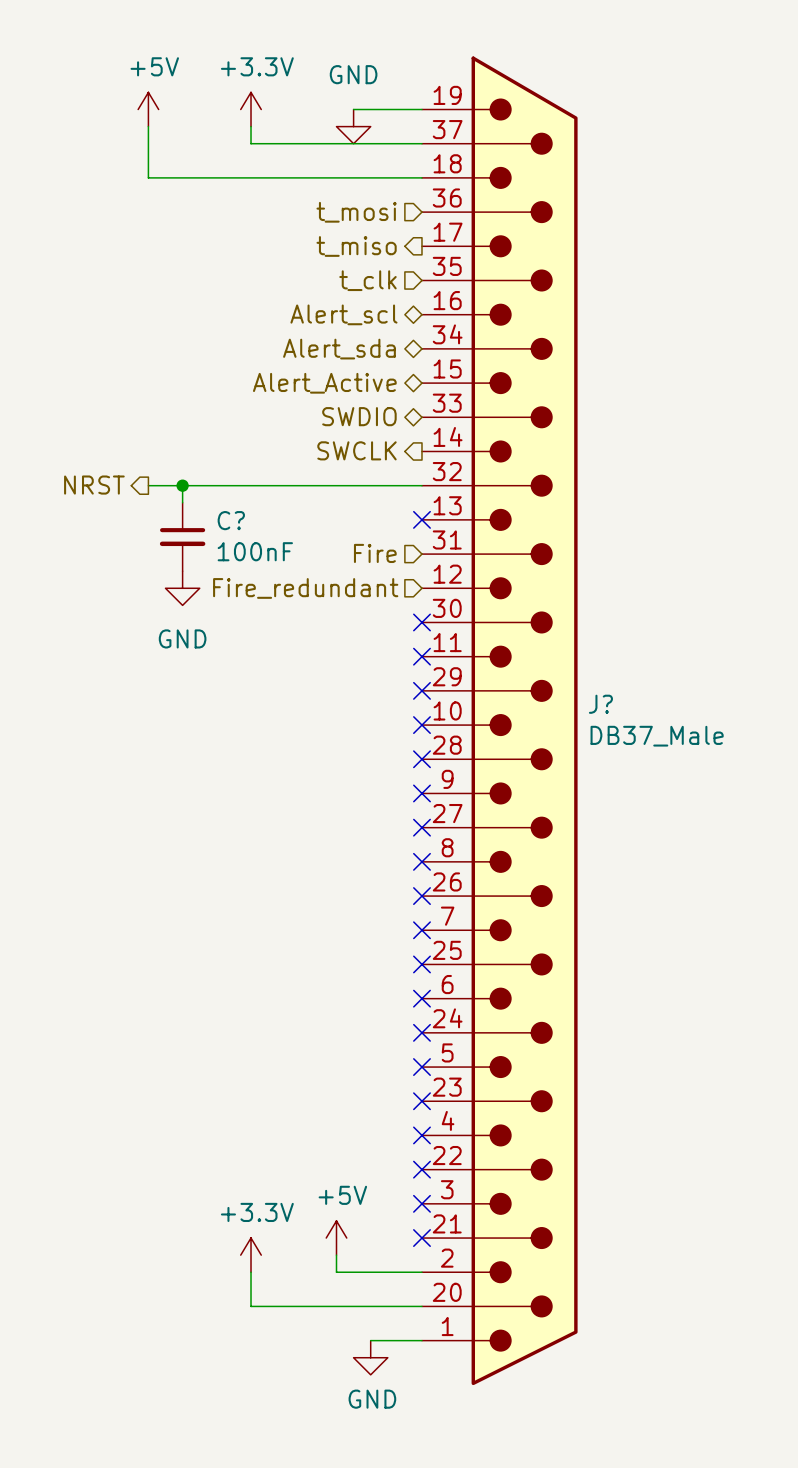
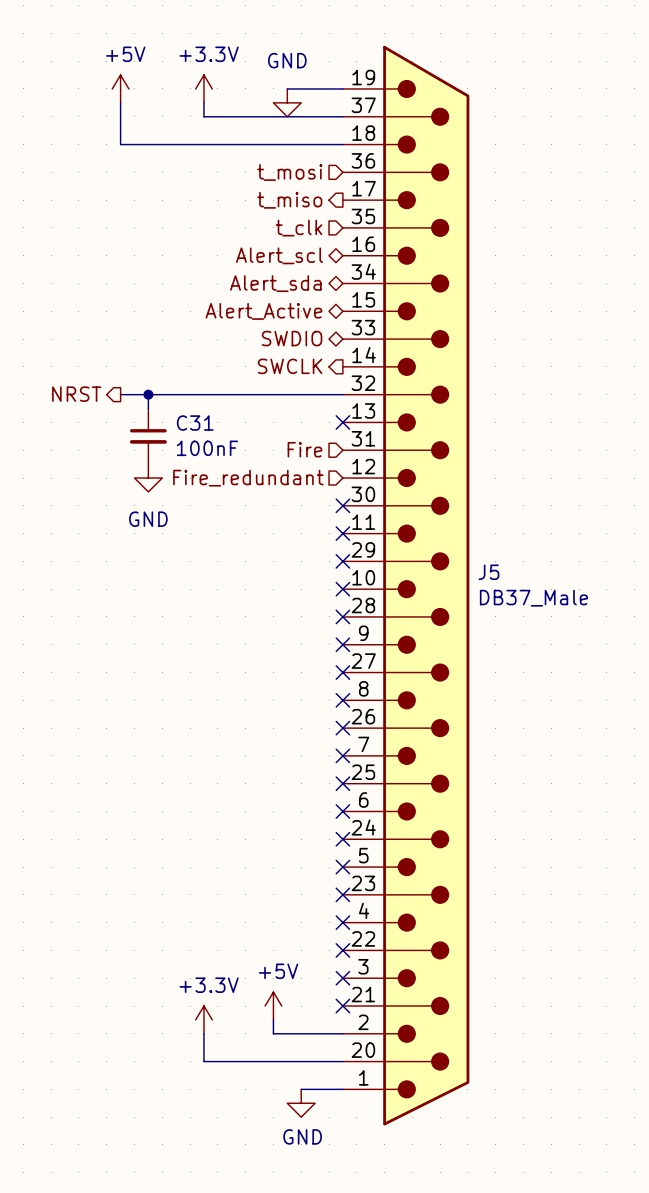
C? name: C? (231, 520) -> C31 (195, 423)
J? name: J? (600, 704) -> J5 (488, 572)

